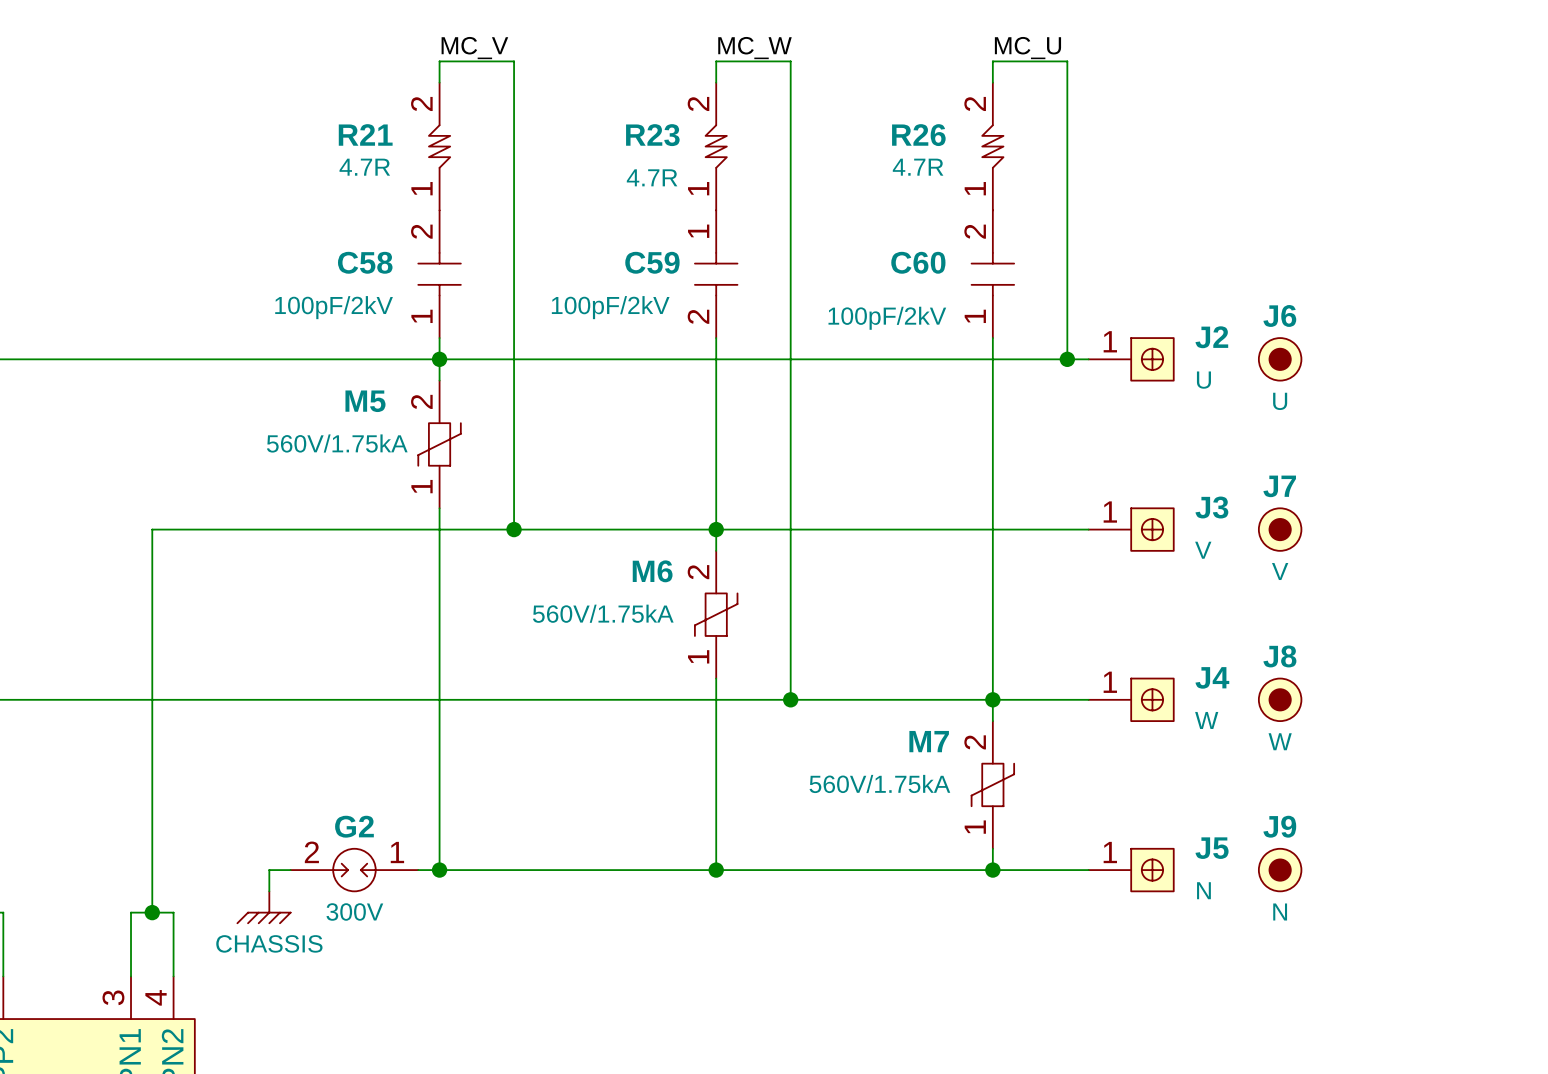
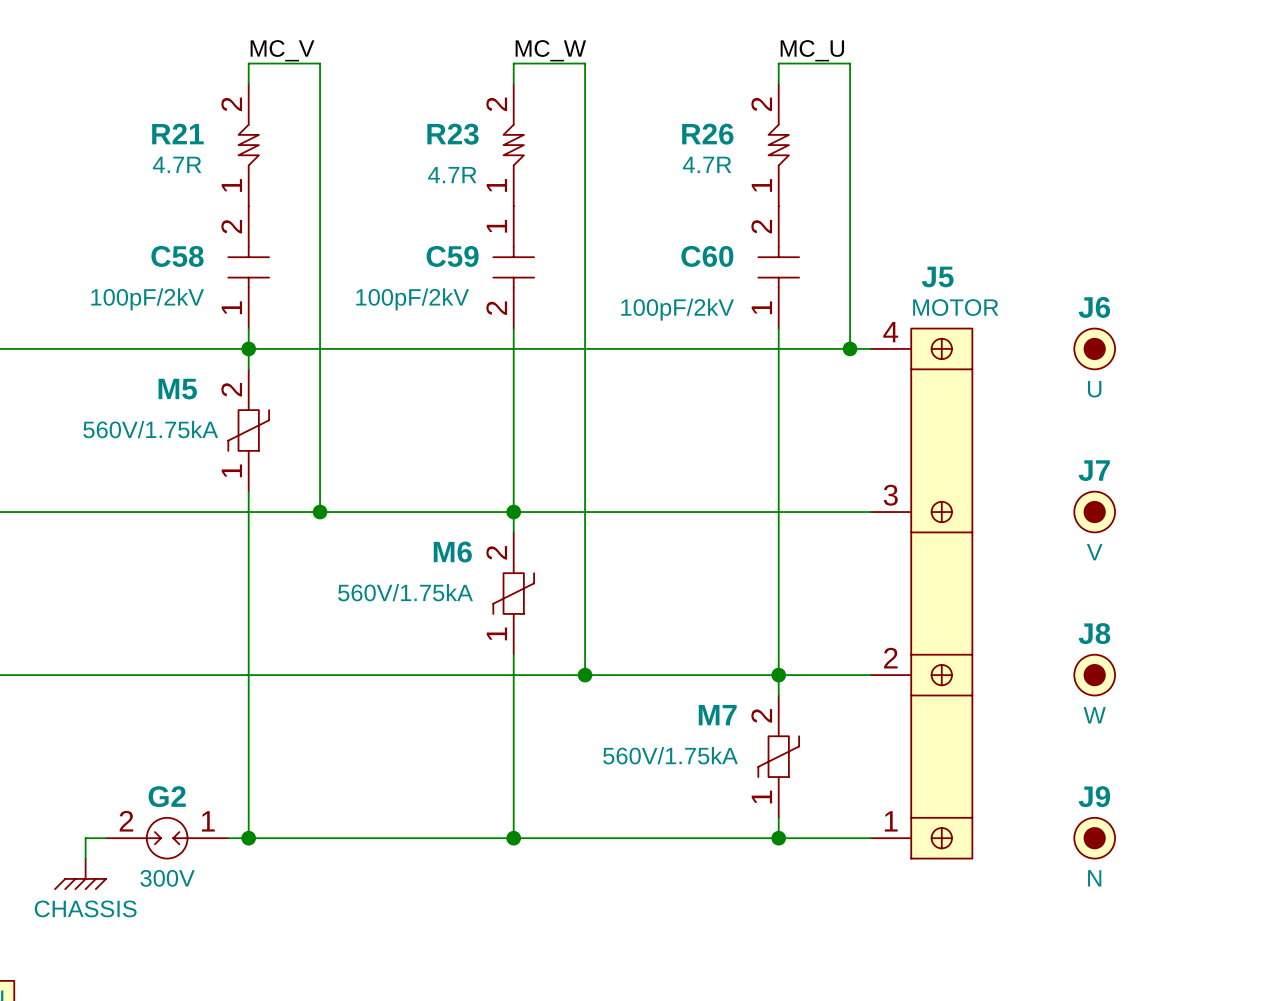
J2: U (1131, 359) -> none
J6 position: (1280, 359) -> (1094, 348)
J3: V (1131, 529) -> none
J7 position: (1280, 529) -> (1094, 512)
J4: W (1131, 699) -> none
J8 position: (1280, 699) -> (1094, 675)
J5 symbol: [1088, 848, 1174, 892] -> [870, 328, 973, 859]
J5 name position: J5 (1212, 848) -> J5 (937, 276)
J9 position: (1280, 870) -> (1094, 838)
J5 value: N (1203, 890) -> MOTOR (955, 307)

